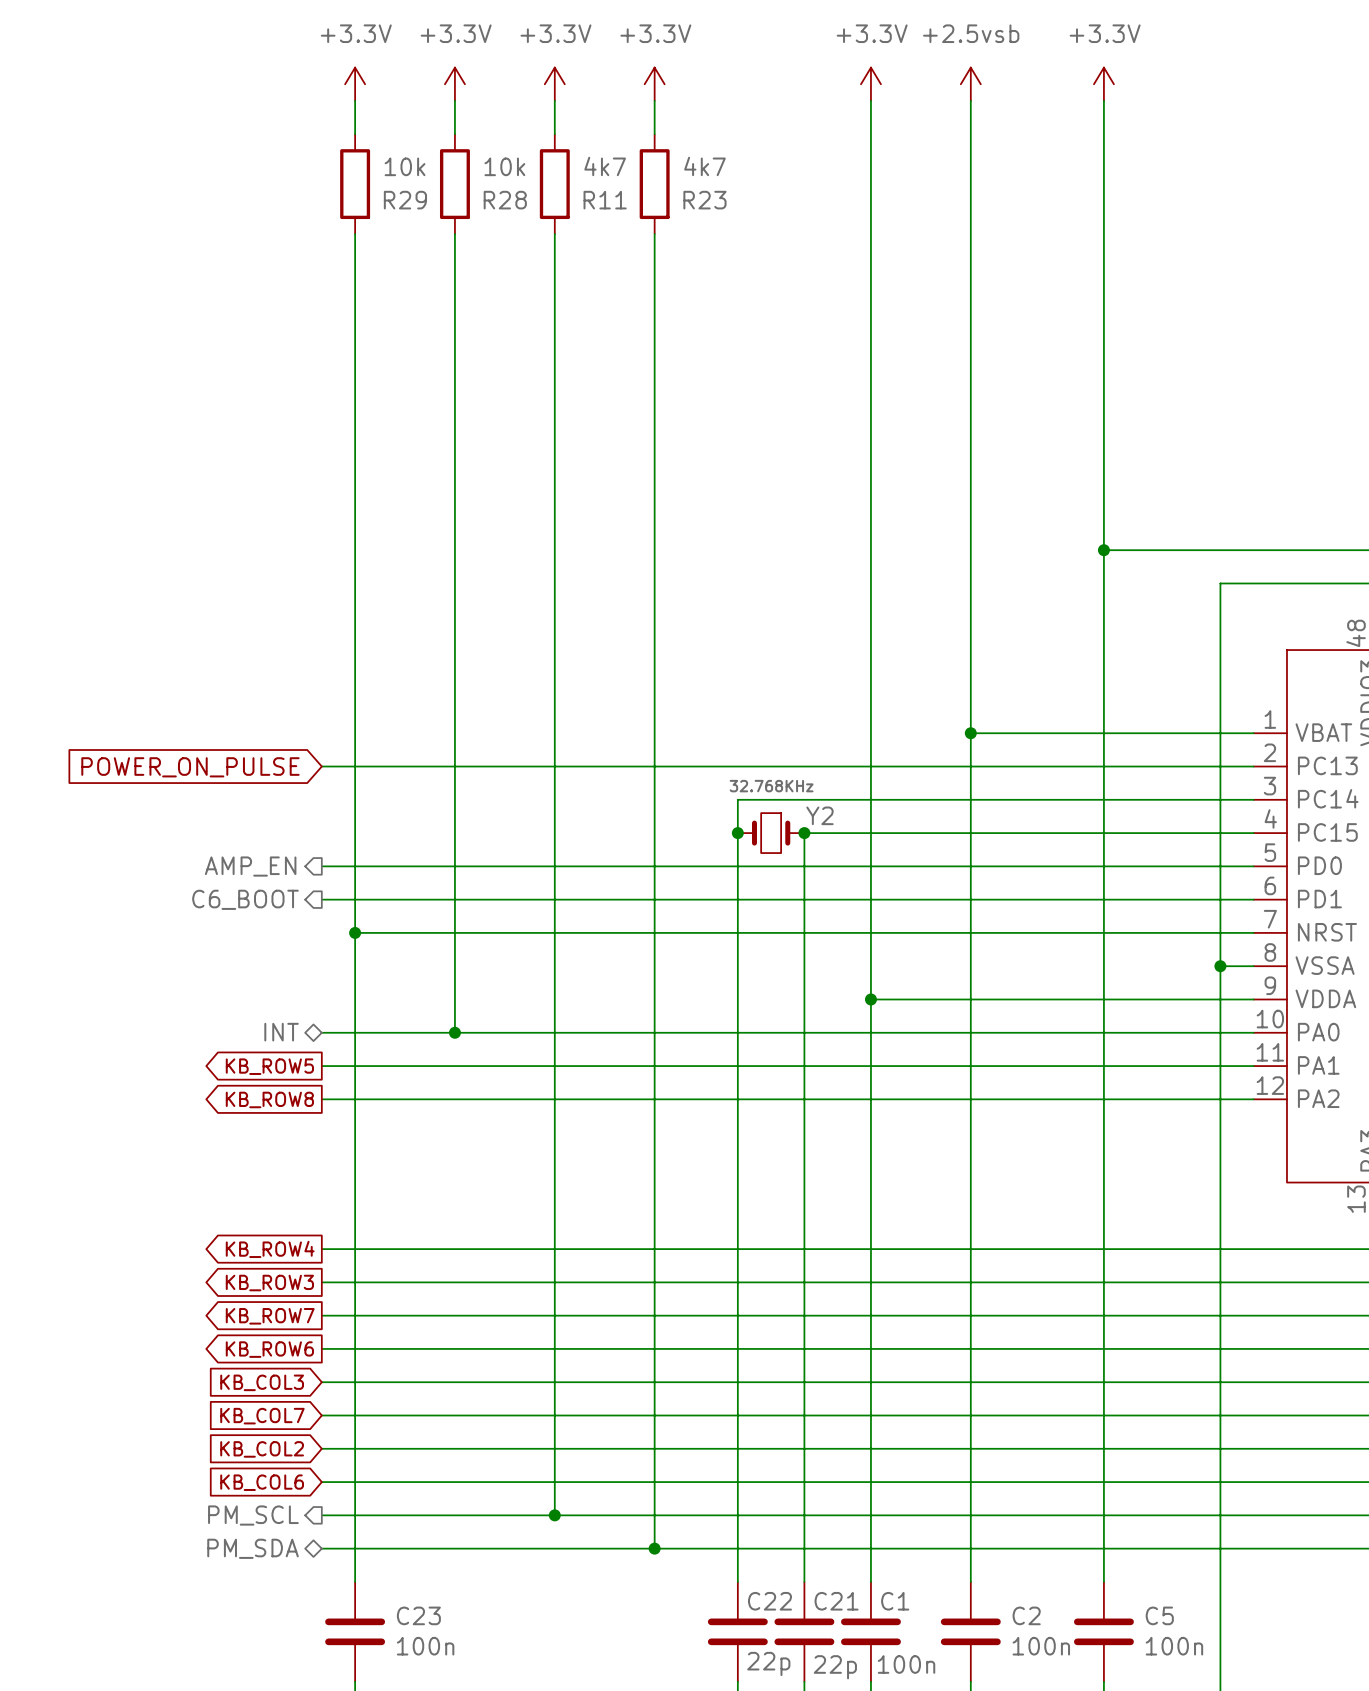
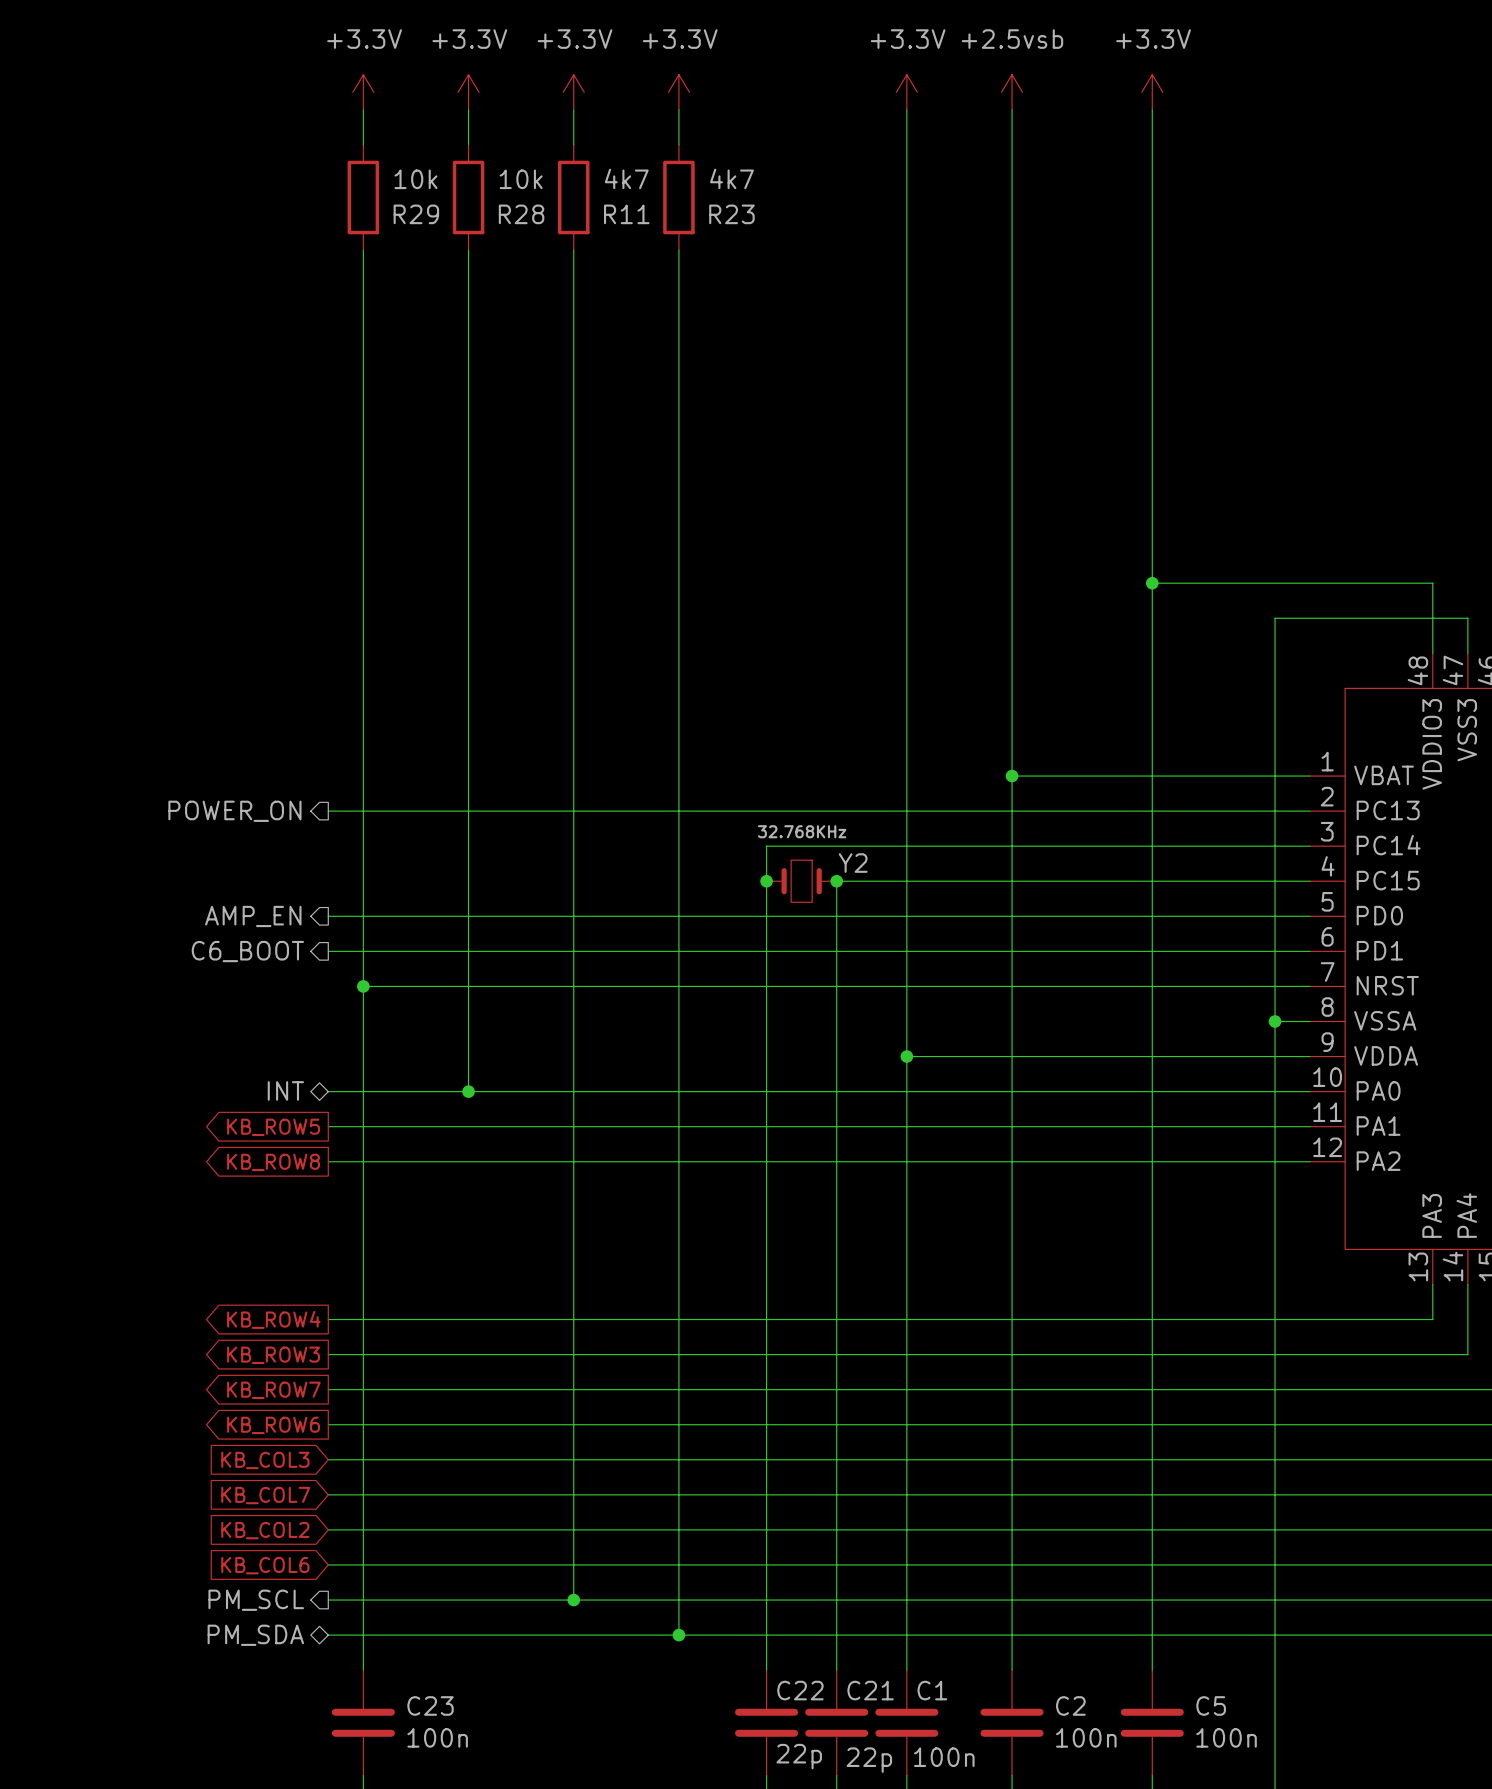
hierarchical label: none -> POWER_ON (234, 811)
global label: POWER_ON_PULSE (190, 767) -> none

